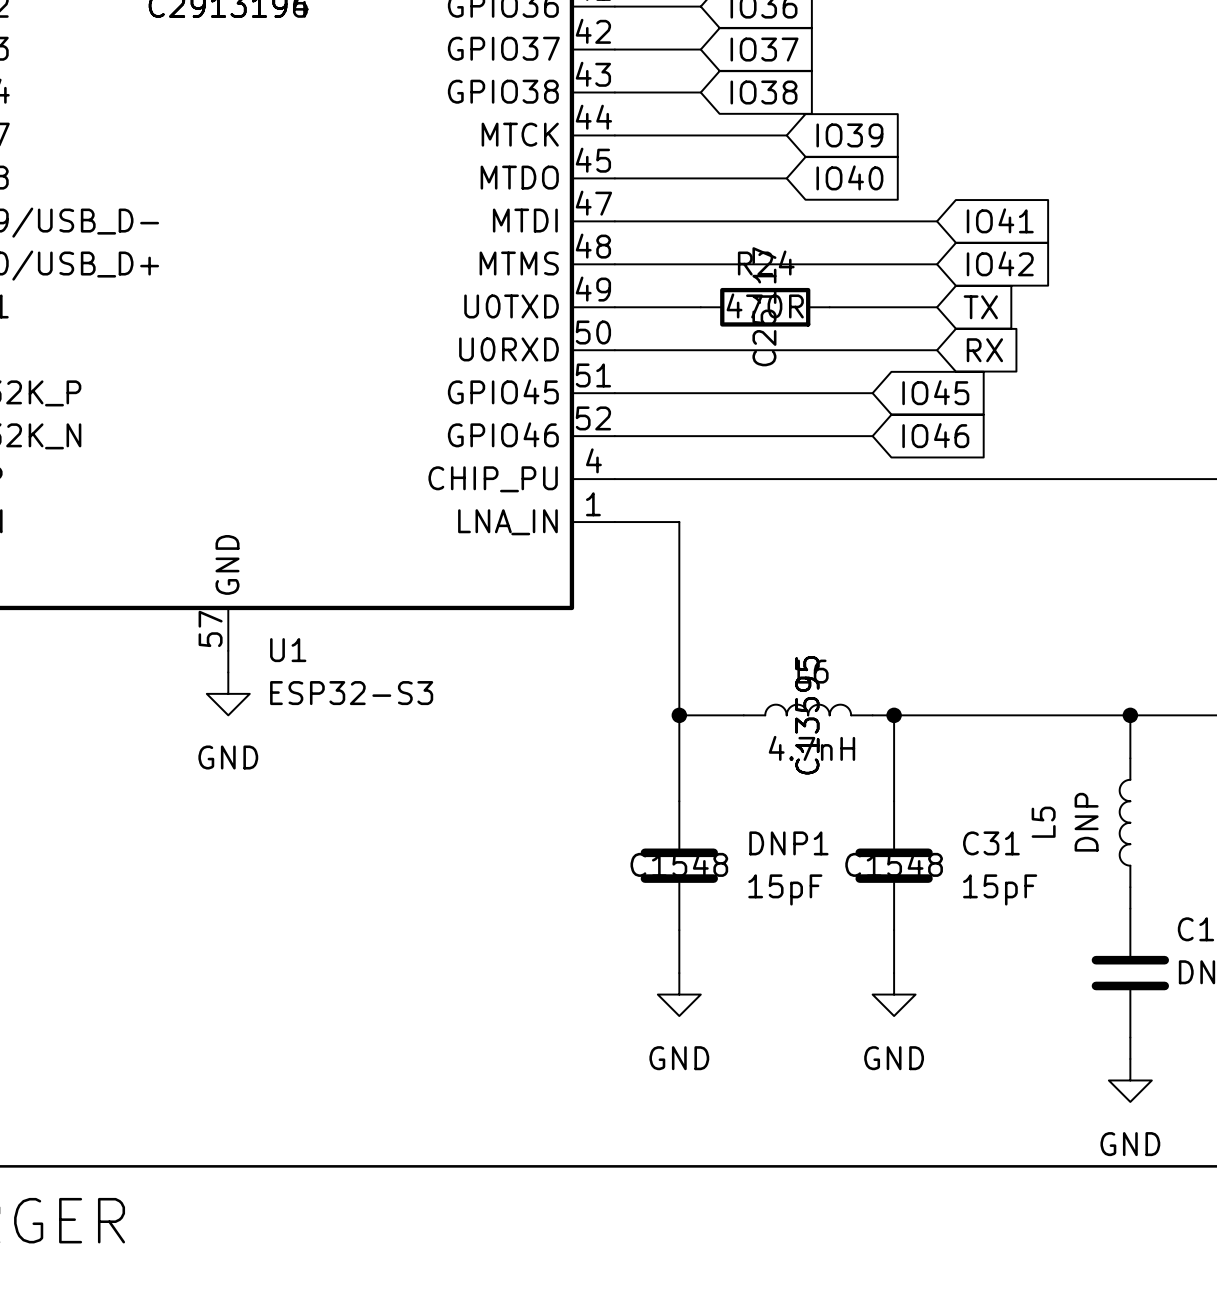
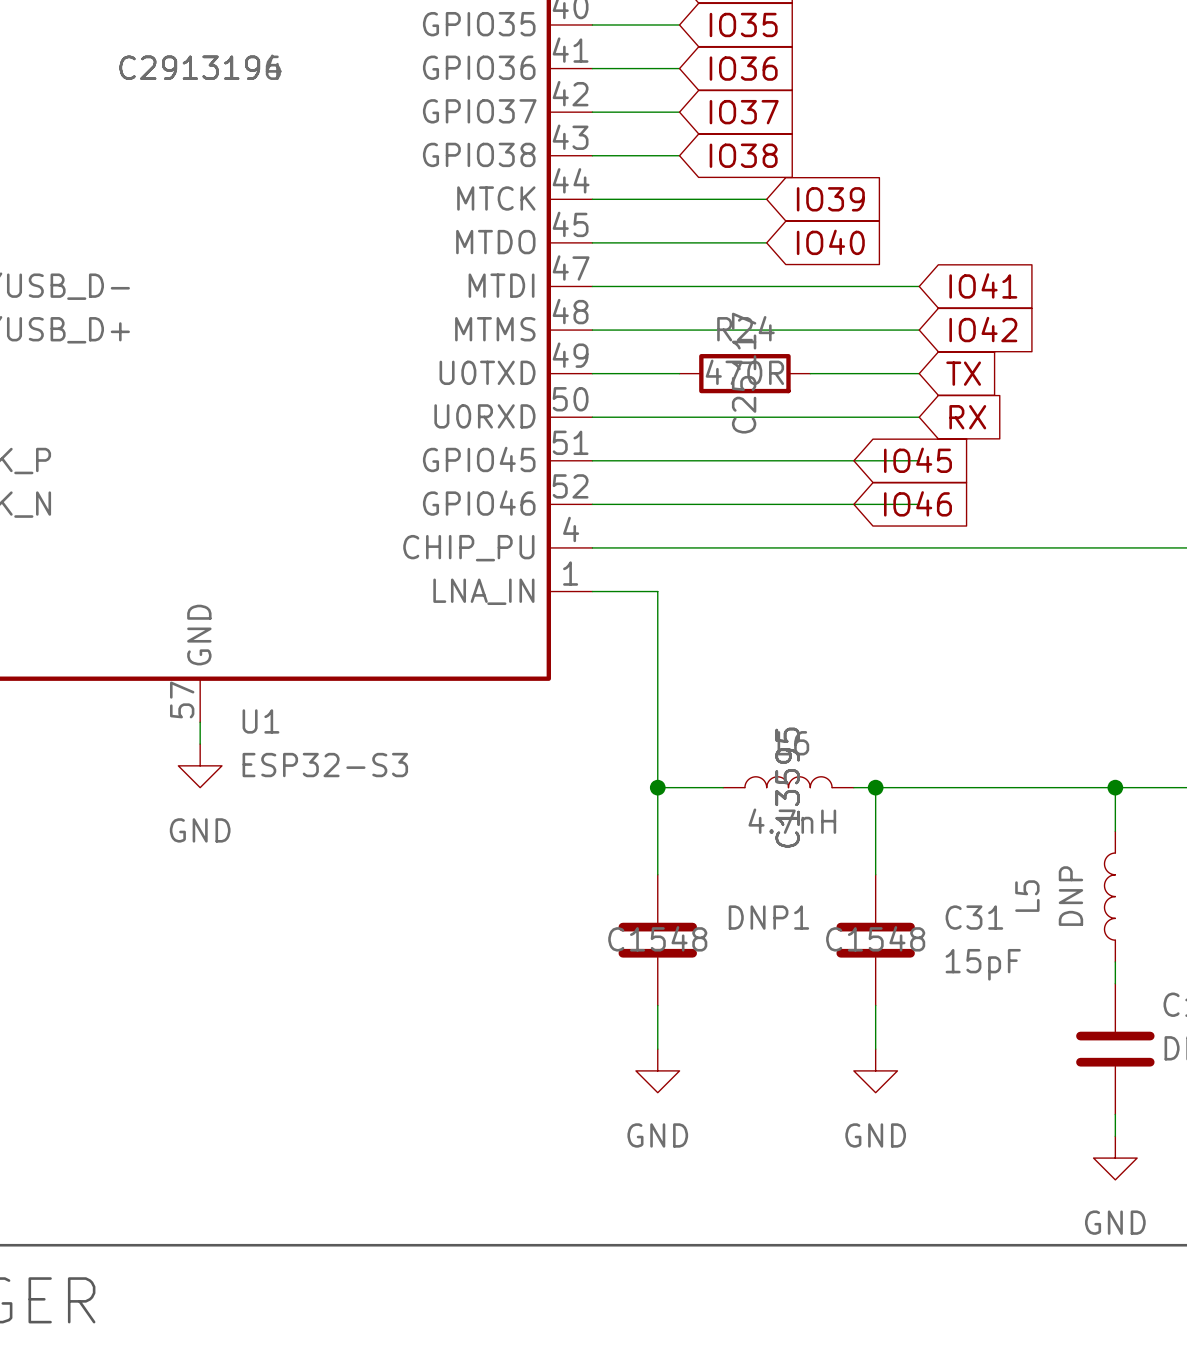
wire: none -> (853, 460) (919, 460)
wire: none -> (853, 504) (919, 504)
DNP1 value: 15pF (785, 889) -> none

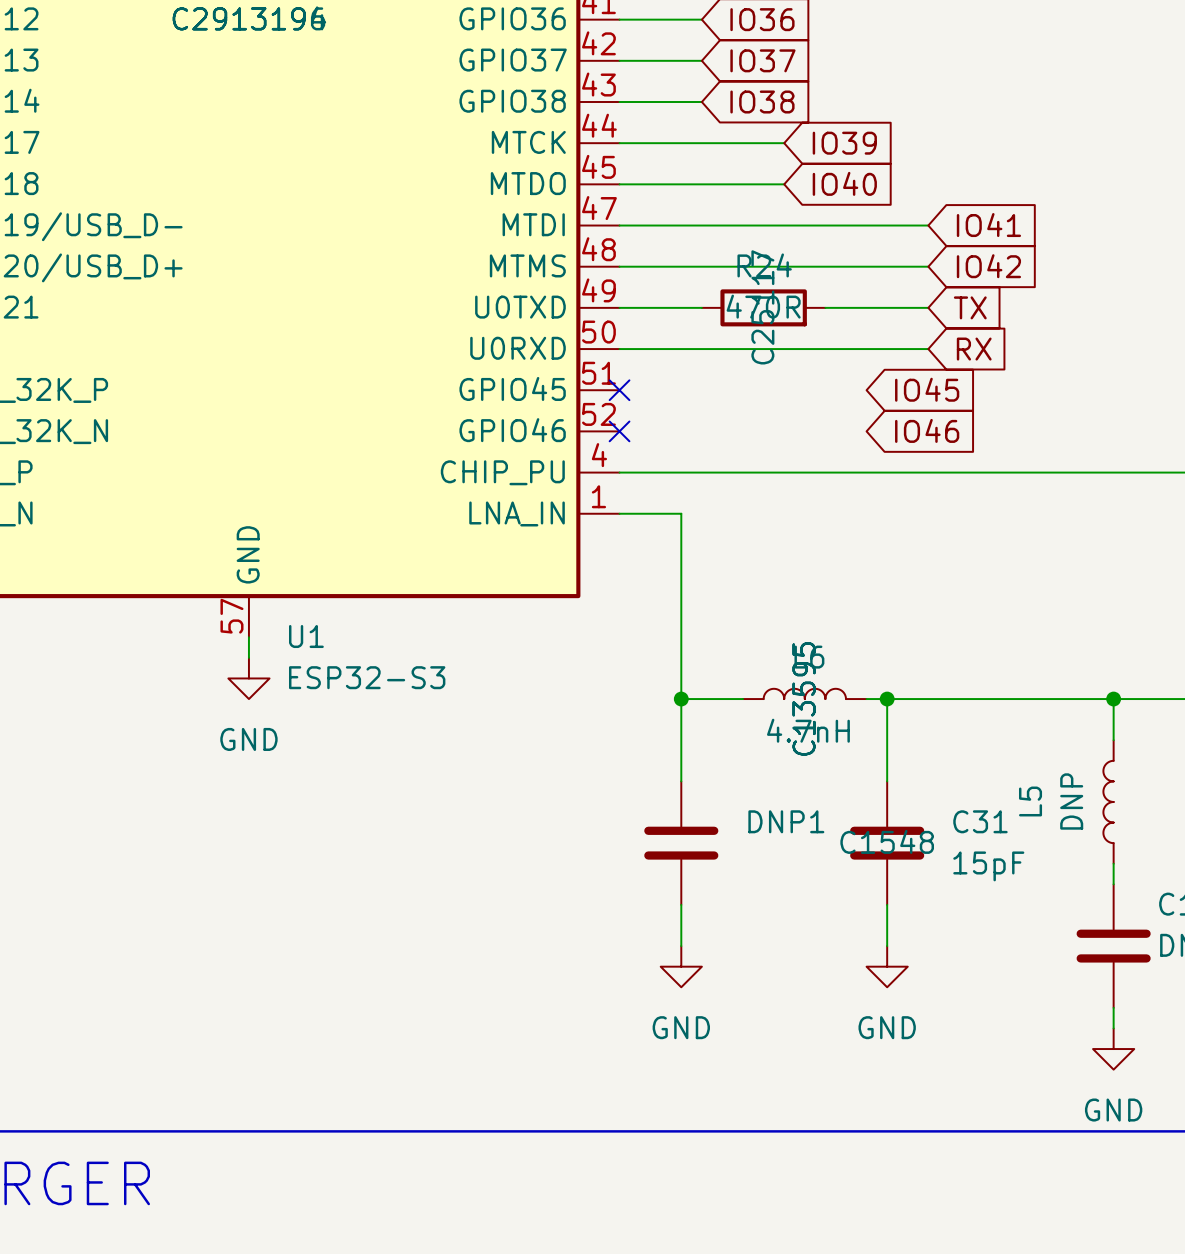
wire: (592, 460) (919, 460) -> none
no-connect mark: none -> (619, 390)
wire: (592, 504) (919, 504) -> none
no-connect mark: none -> (619, 431)
DNP1 text: C1548 (657, 938) -> none

